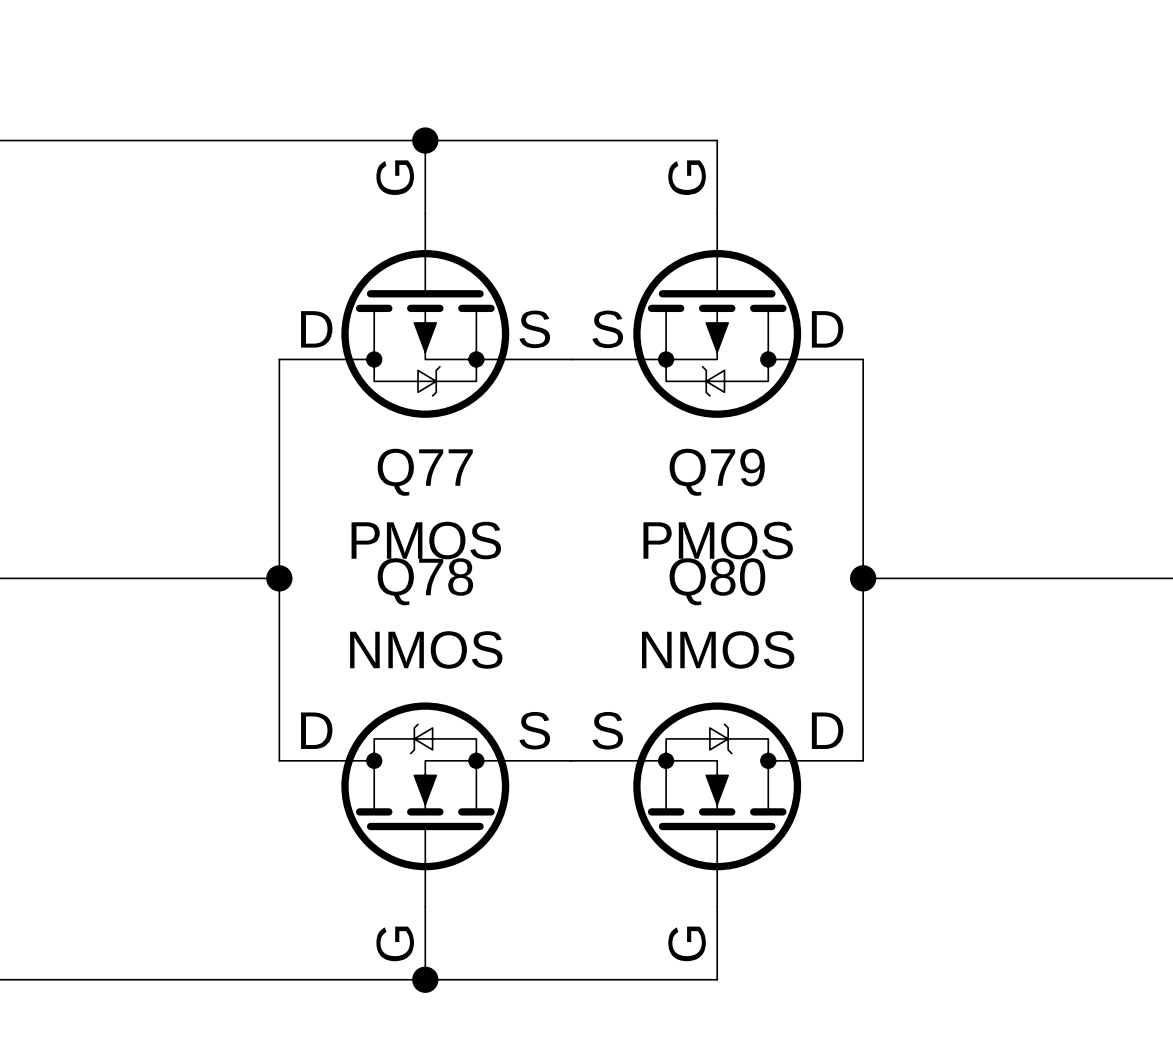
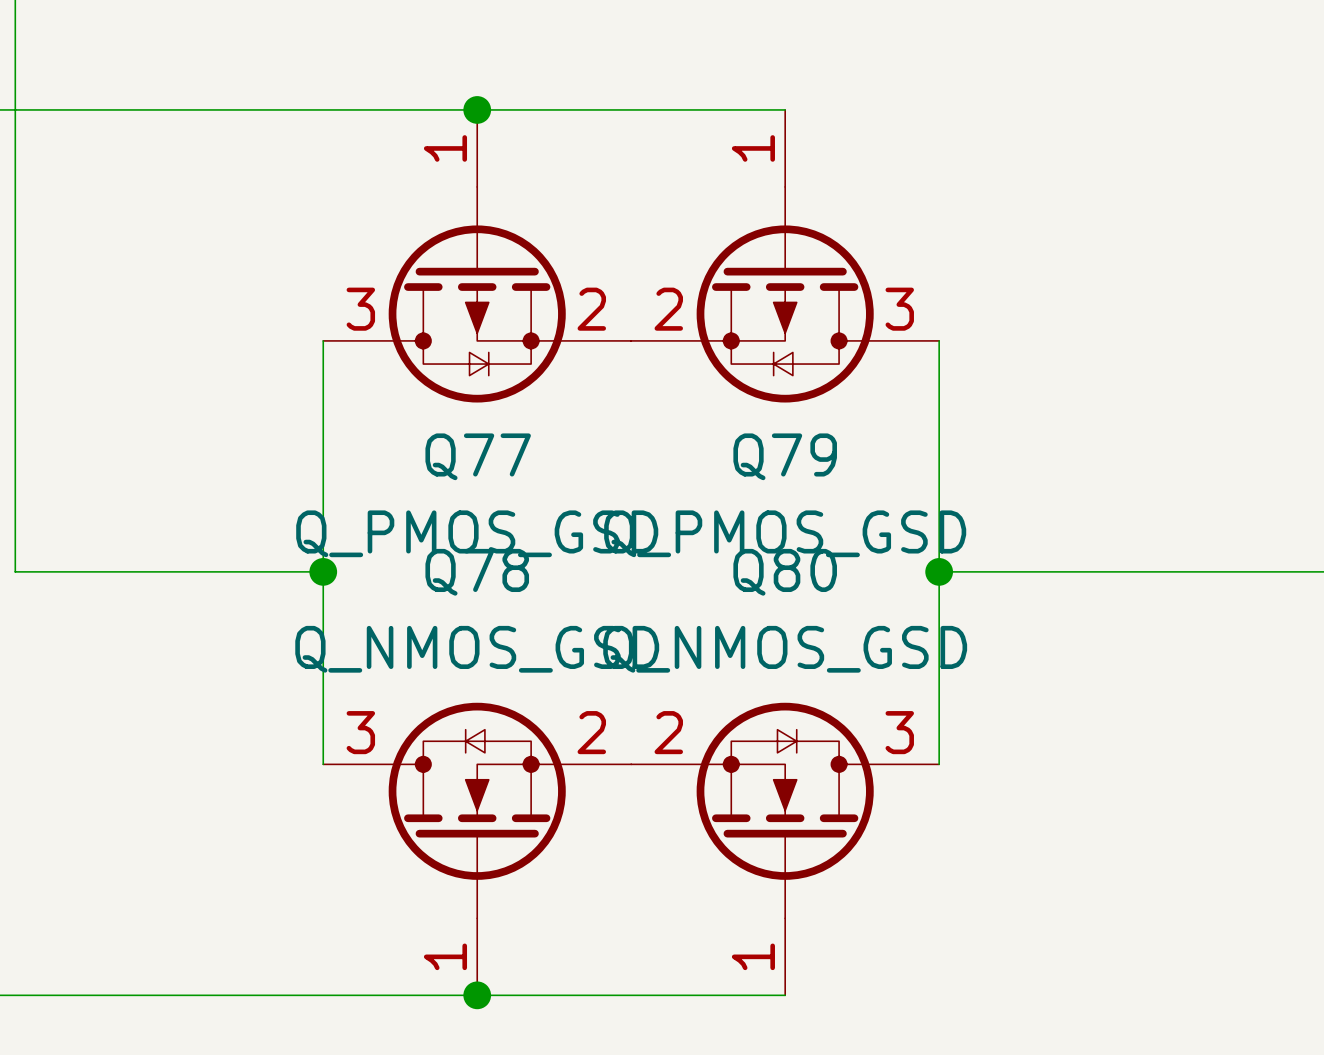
Q77 symbol: [279, 140, 572, 418] -> [323, 109, 632, 403]
Q79 symbol: [571, 140, 864, 418] -> [631, 109, 940, 403]
Q77 value: PMOS (426, 540) -> Q_PMOS_GSD (477, 533)
Q79 value: PMOS (718, 540) -> Q_PMOS_GSD (785, 533)
Q78 value: NMOS (426, 649) -> Q_NMOS_GSD (477, 649)
Q80 value: NMOS (718, 649) -> Q_NMOS_GSD (785, 649)
Q78 symbol: [279, 702, 572, 980] -> [323, 702, 632, 996]
Q80 symbol: [571, 702, 864, 980] -> [631, 702, 940, 996]

